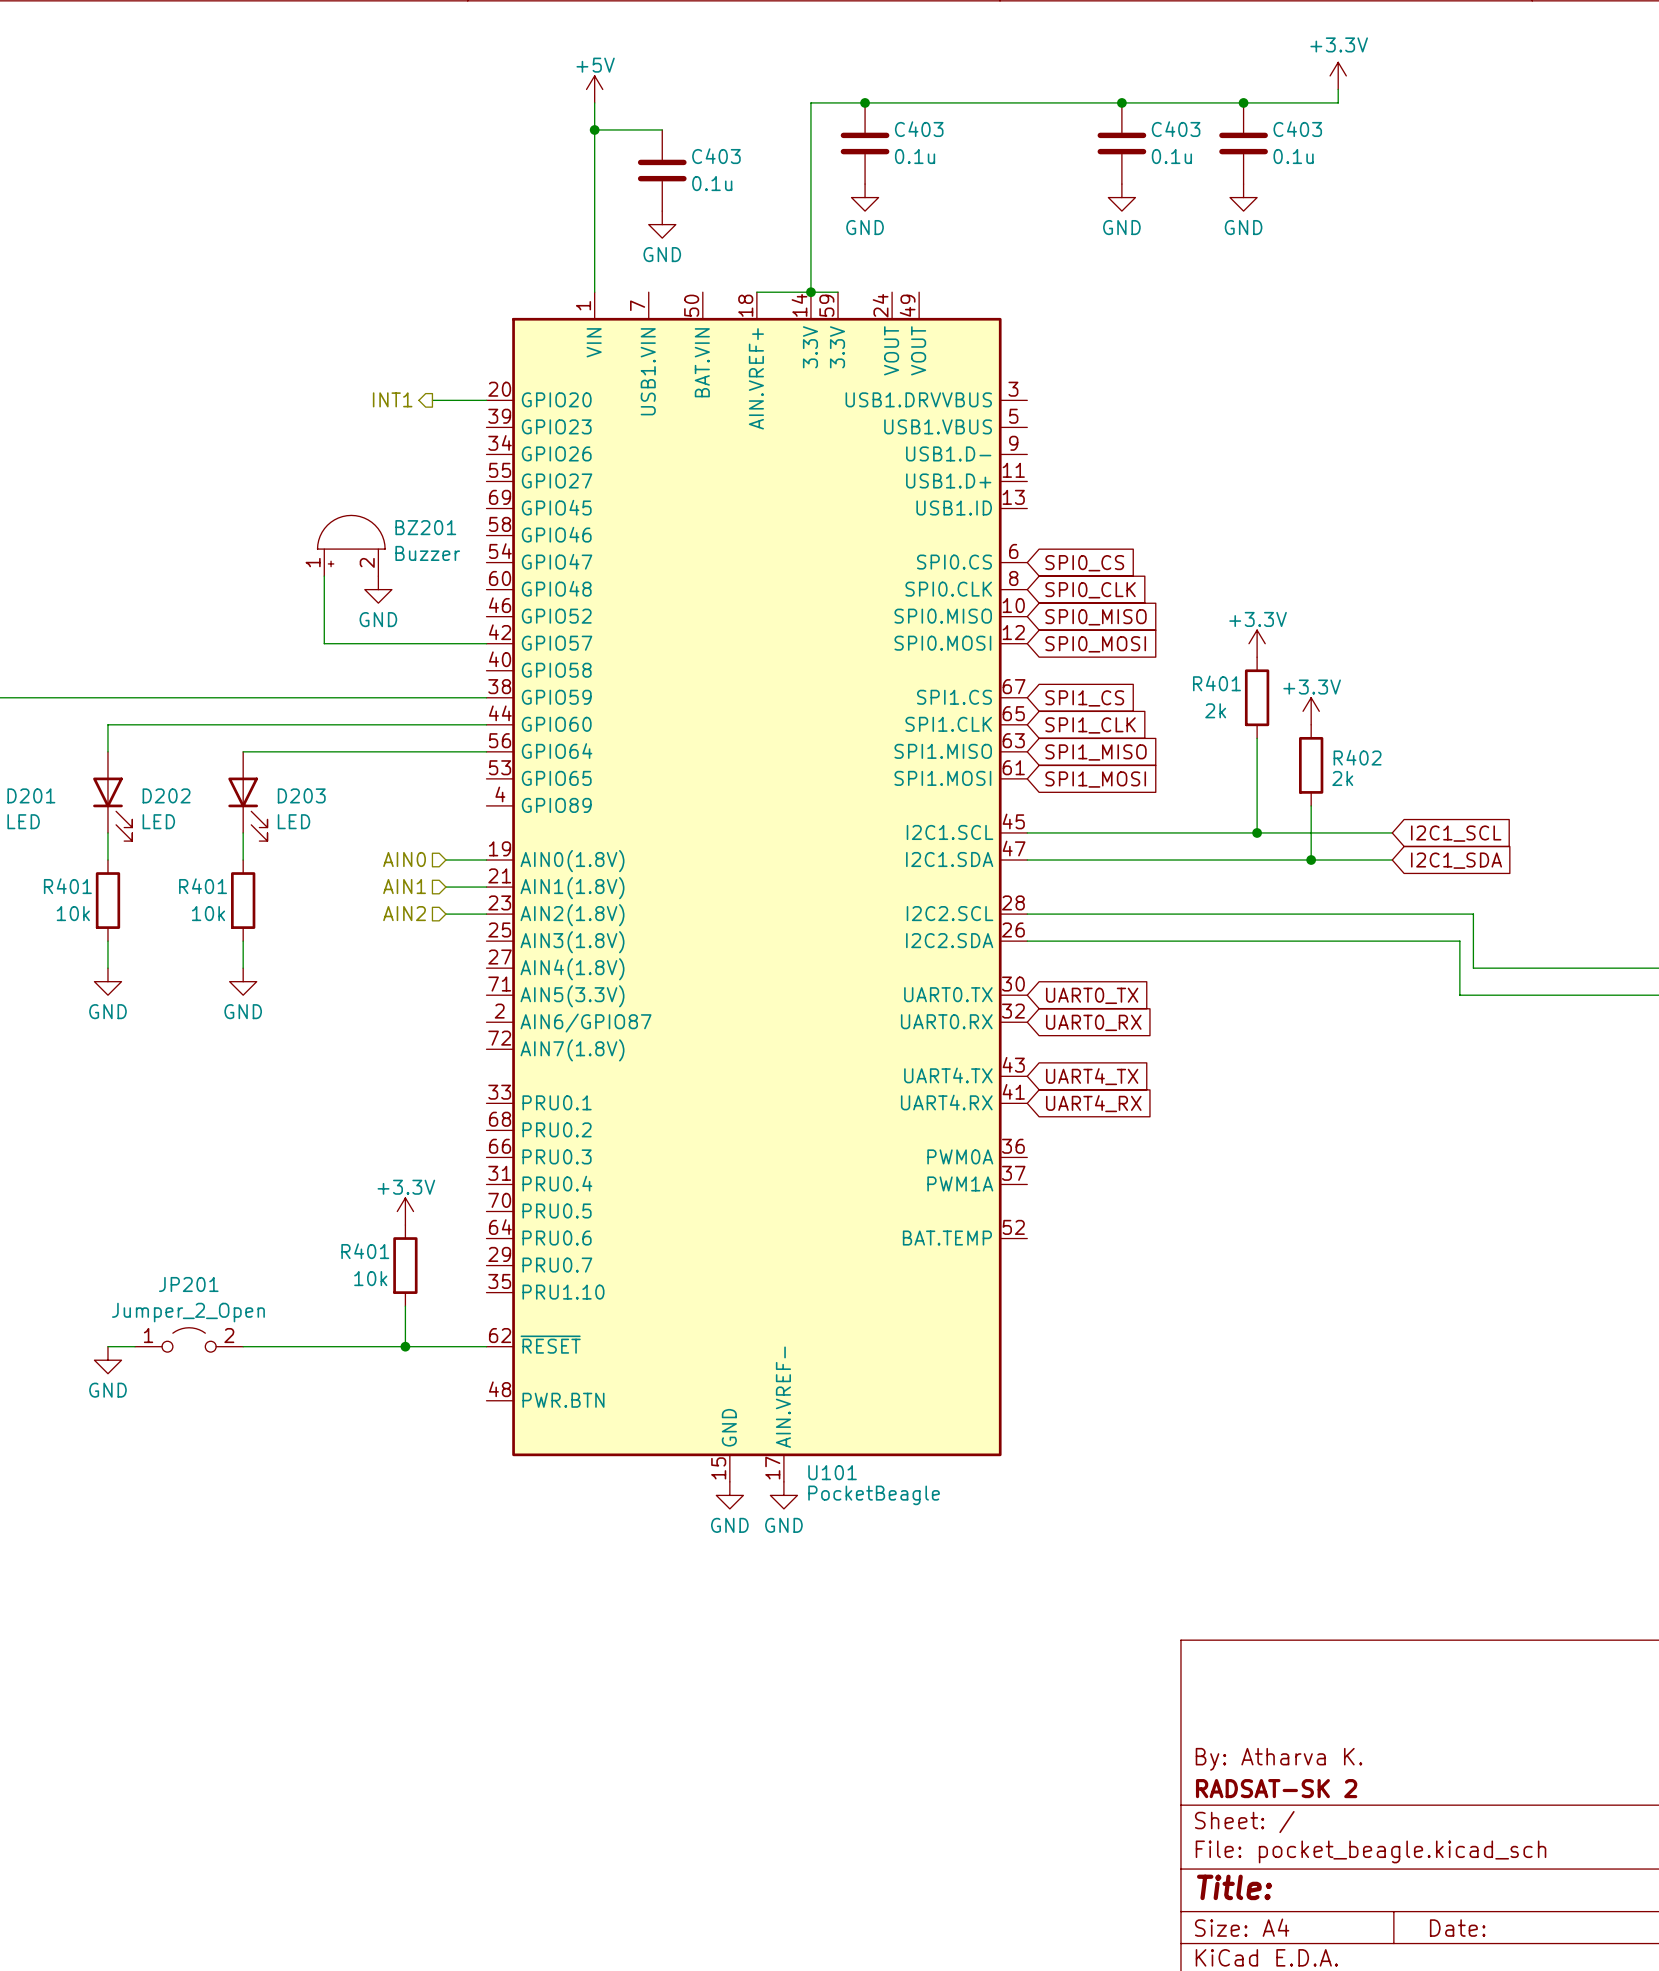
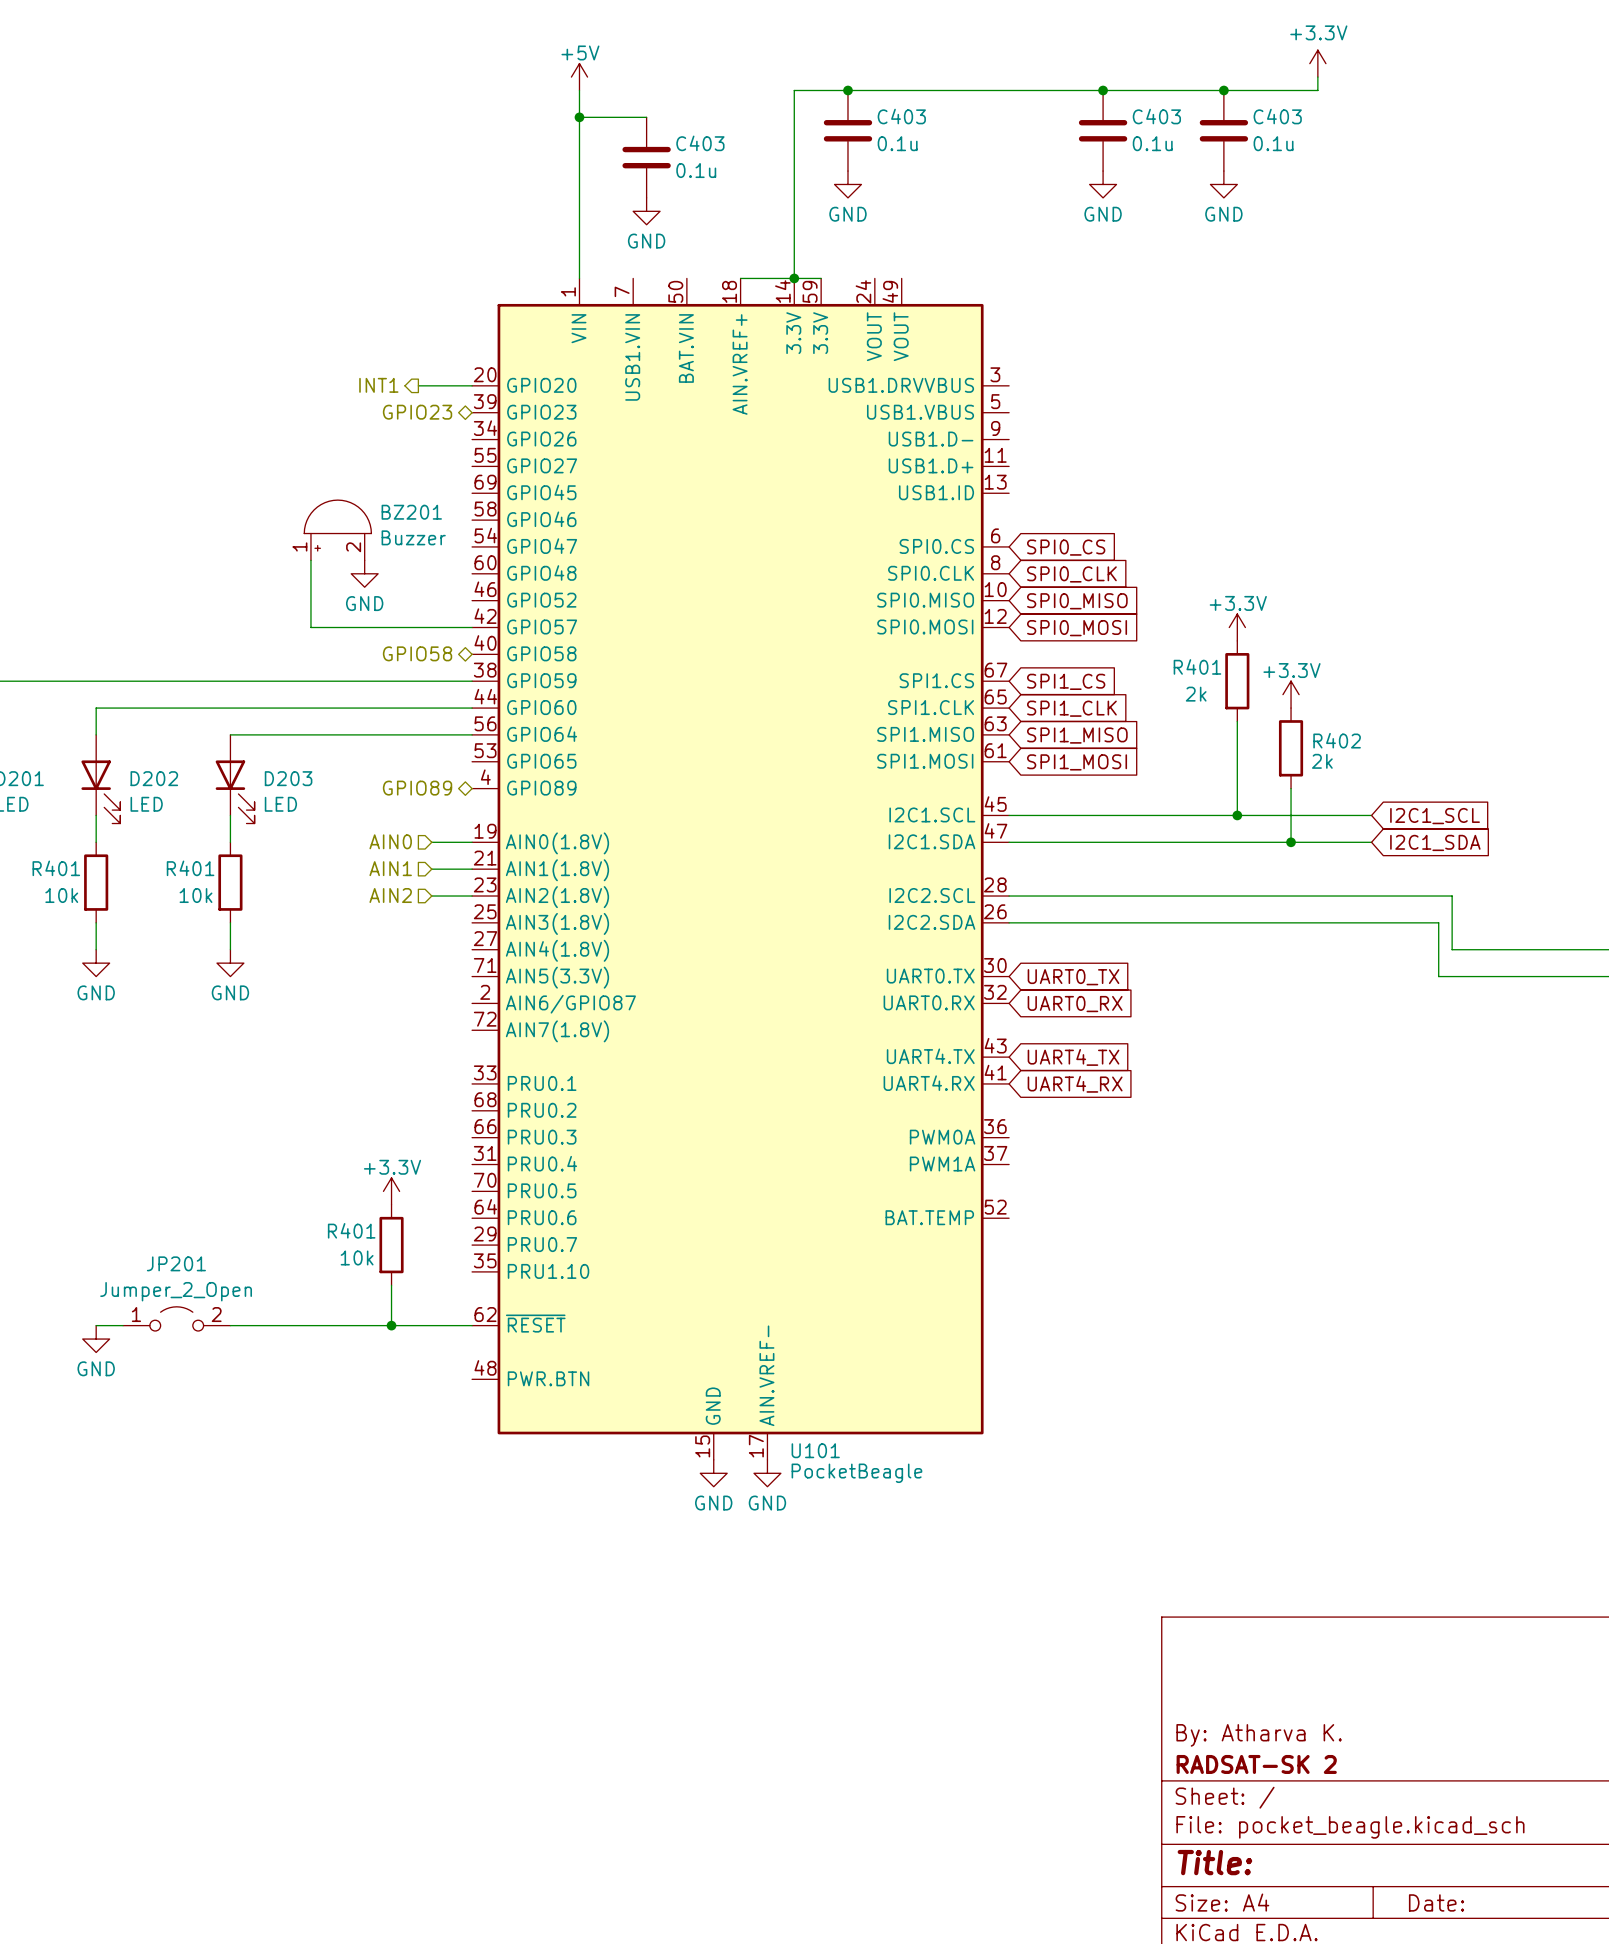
hierarchical label: none -> GPIO23 (417, 412)
hierarchical label: none -> GPIO58 (417, 653)
hierarchical label: none -> GPIO89 (417, 788)

